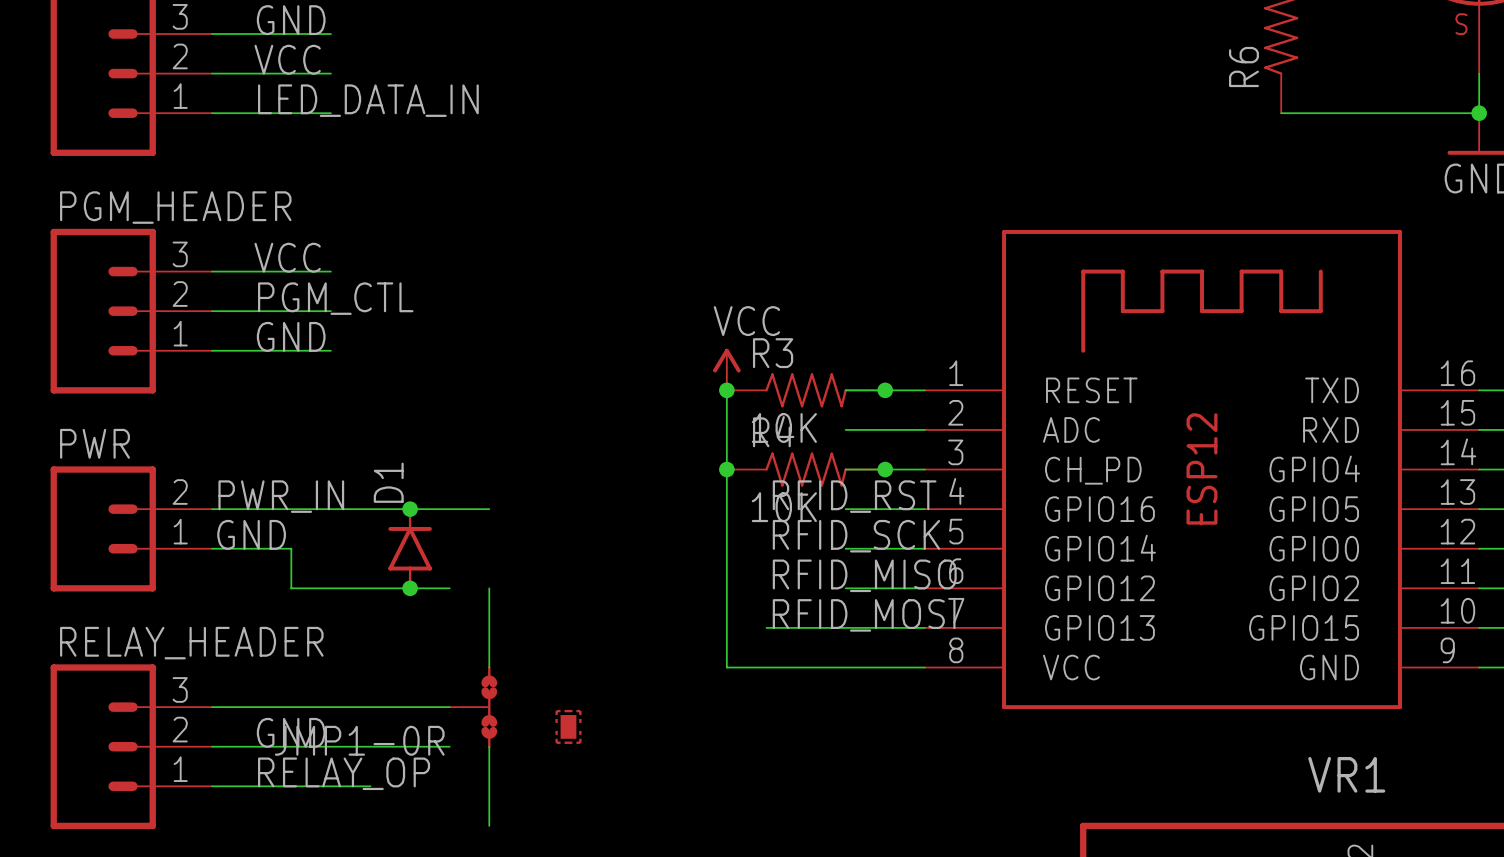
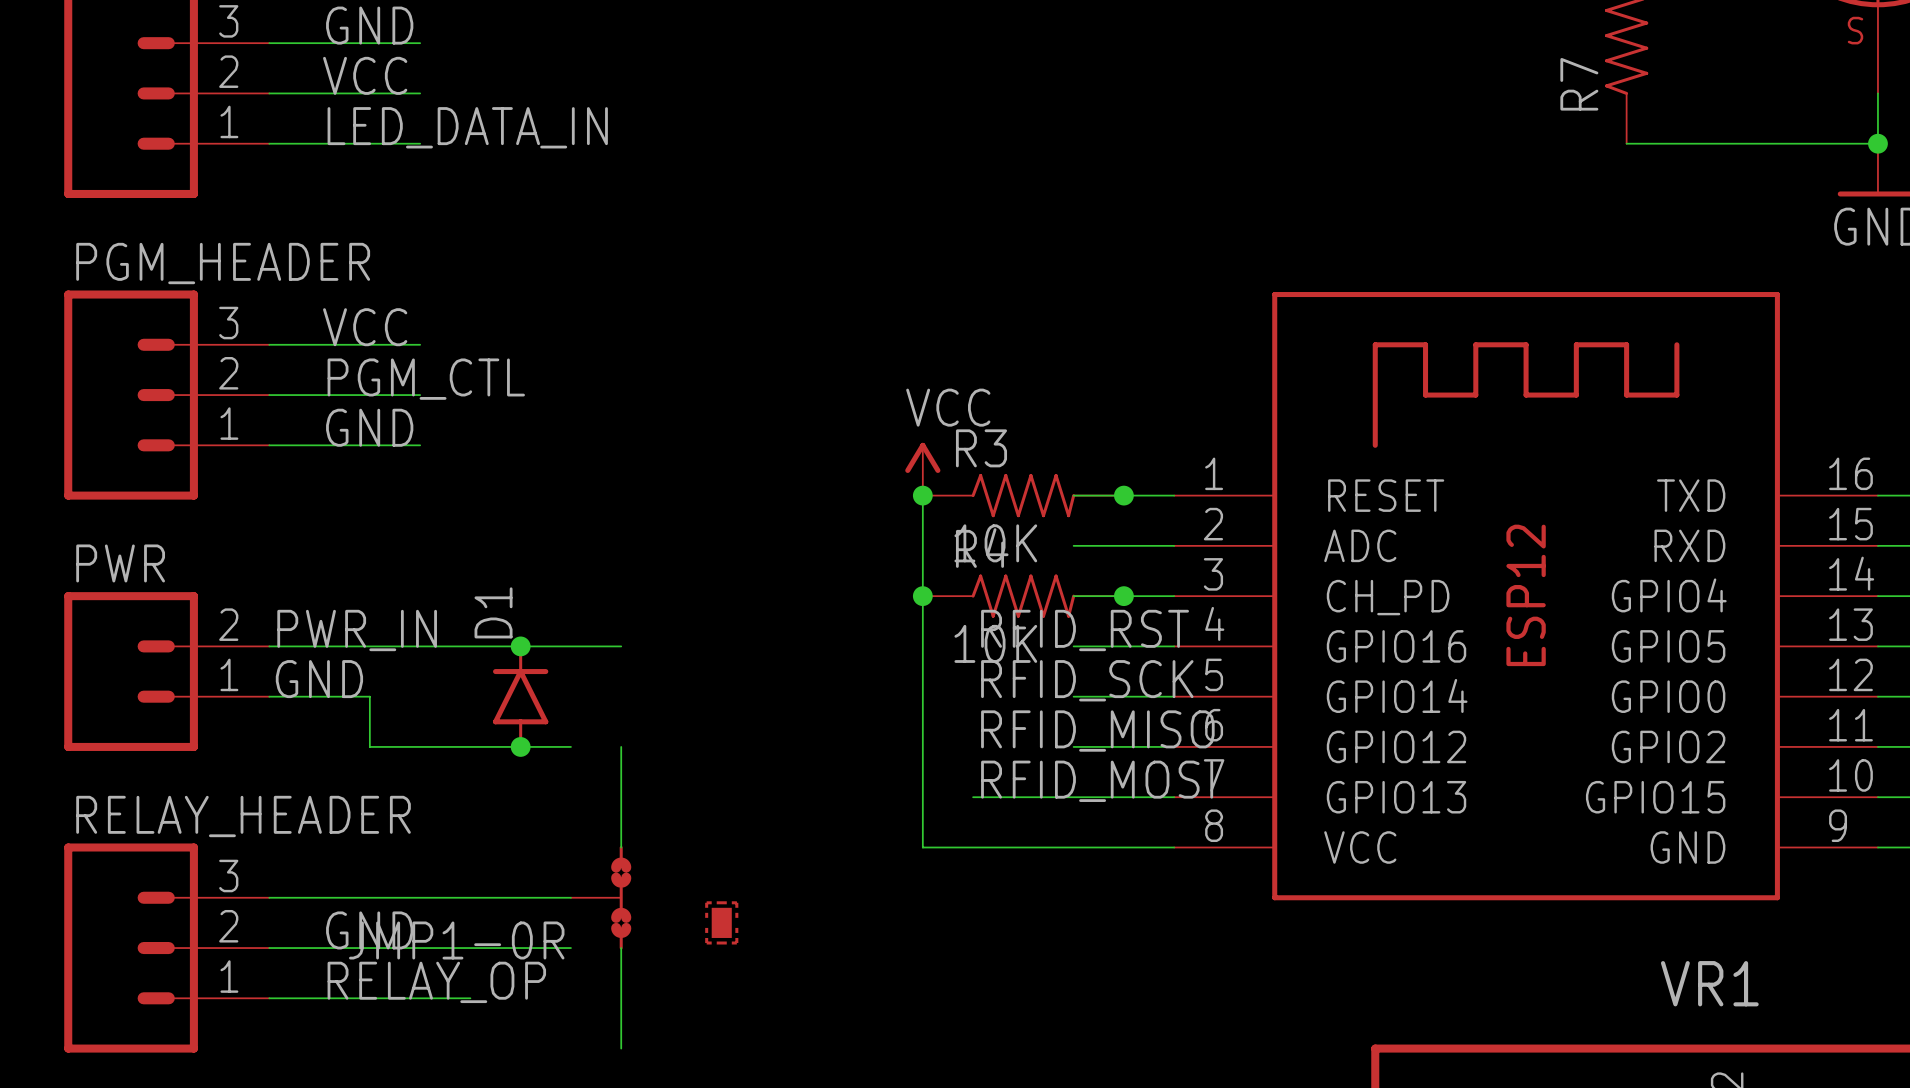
R6 name: R6 (1243, 66) -> R7 (1579, 84)

